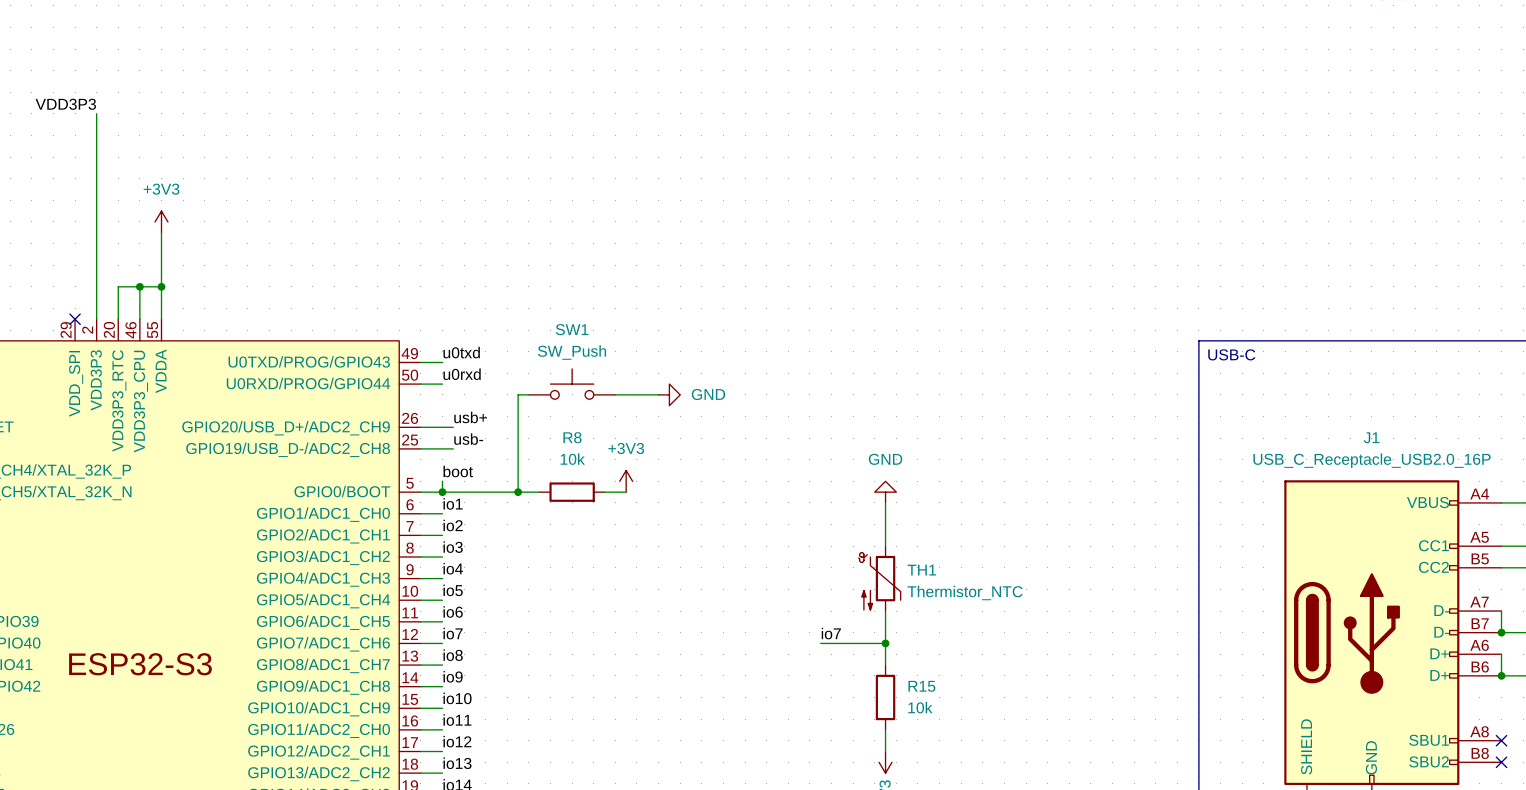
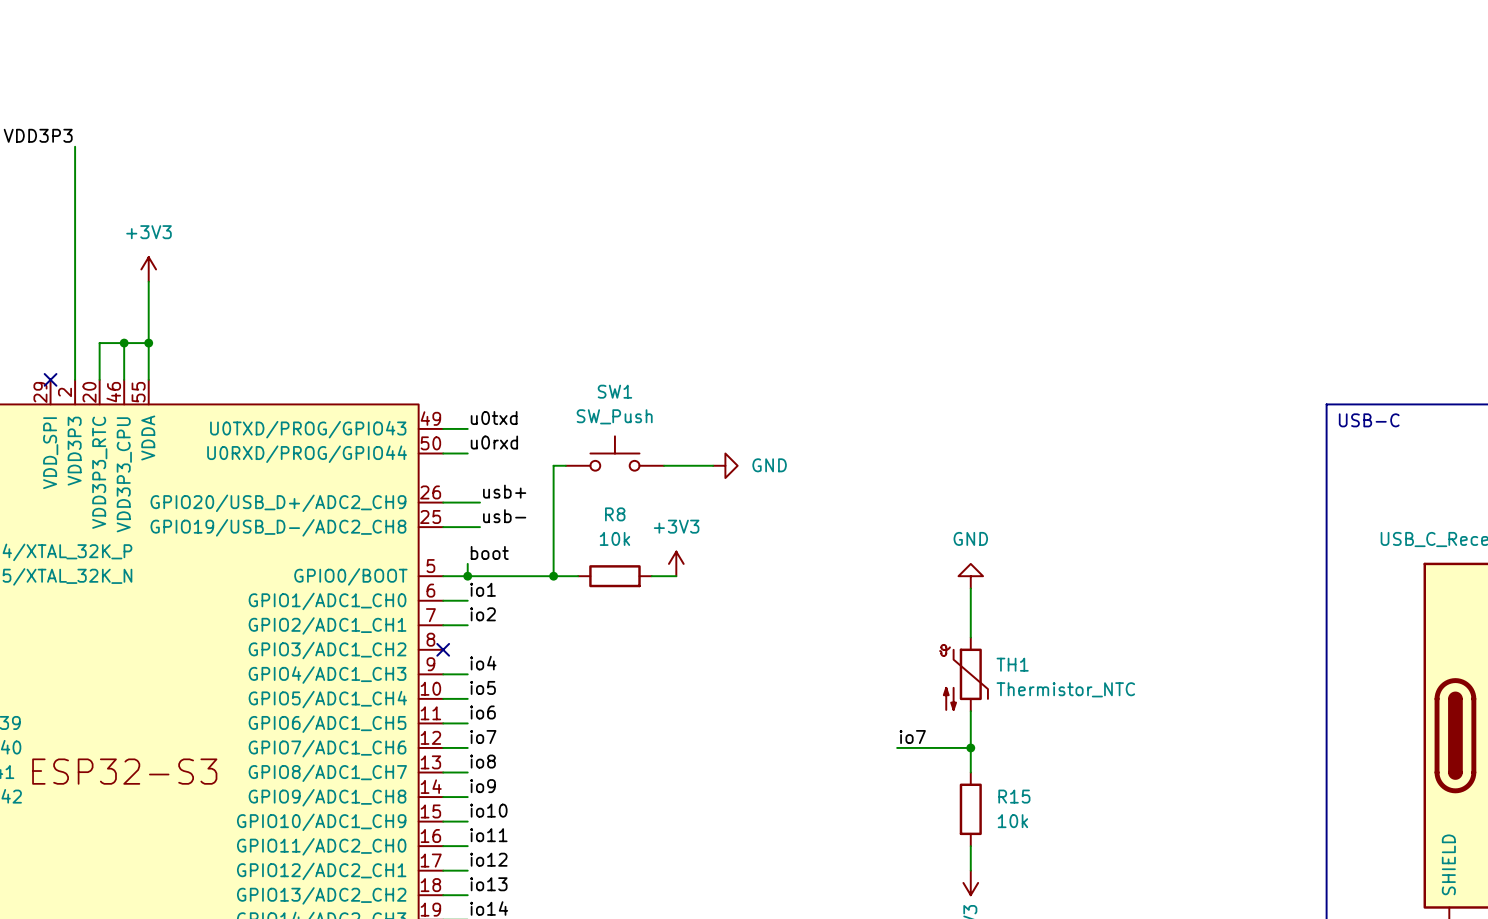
label: io3 (453, 547) -> none
wire: (420, 556) (442, 556) -> none
no-connect mark: none -> (443, 649)

